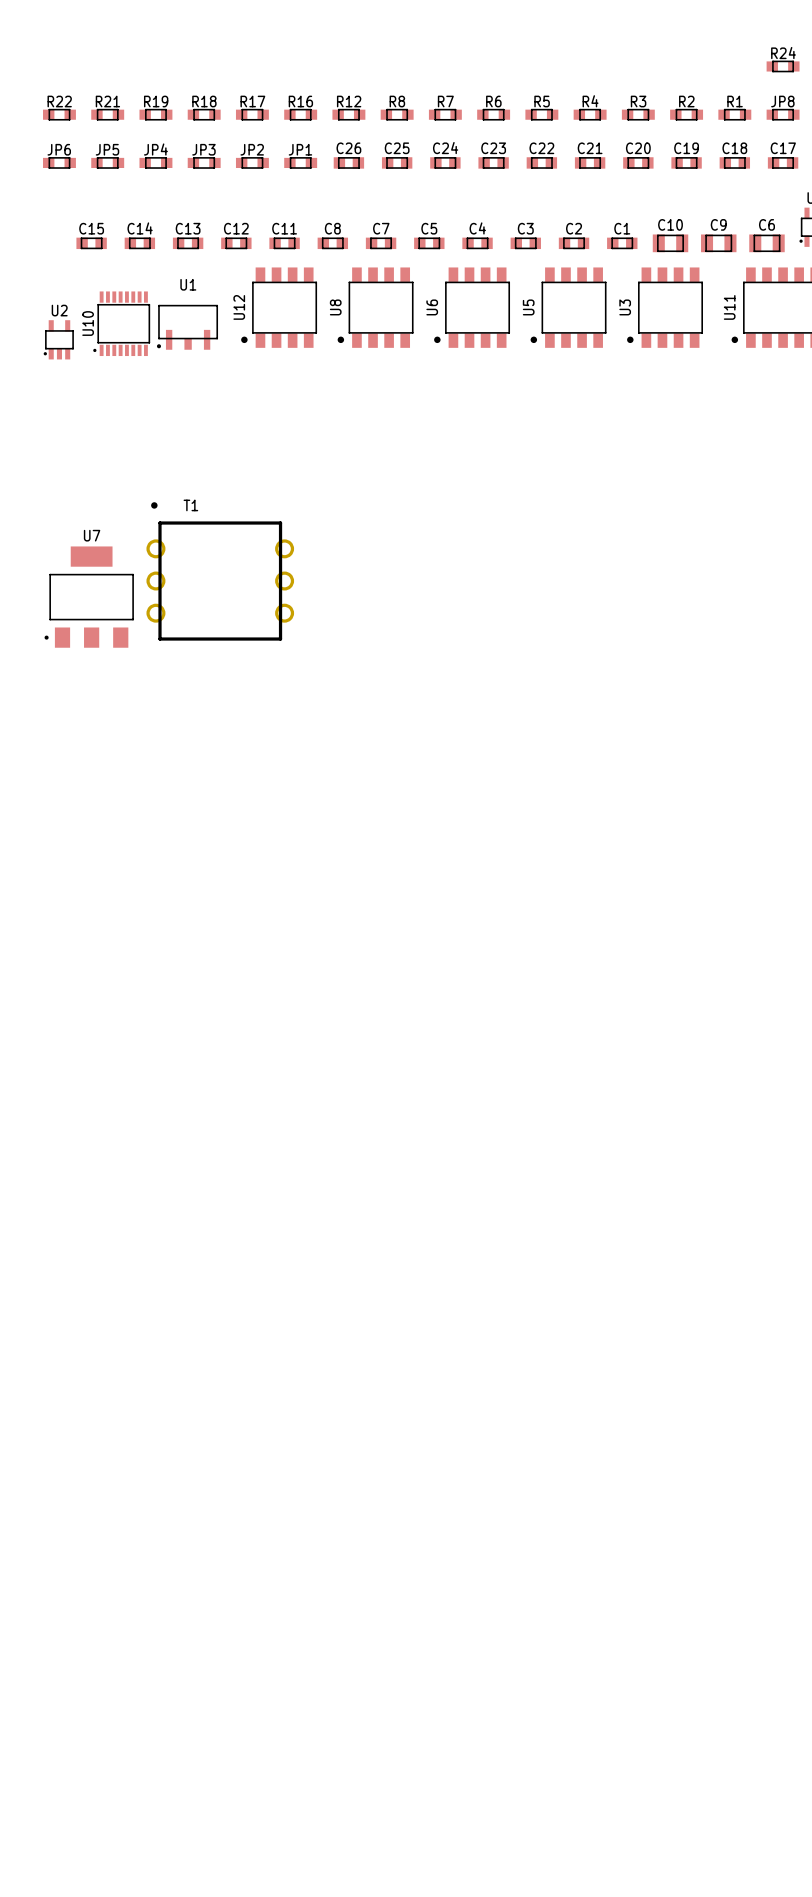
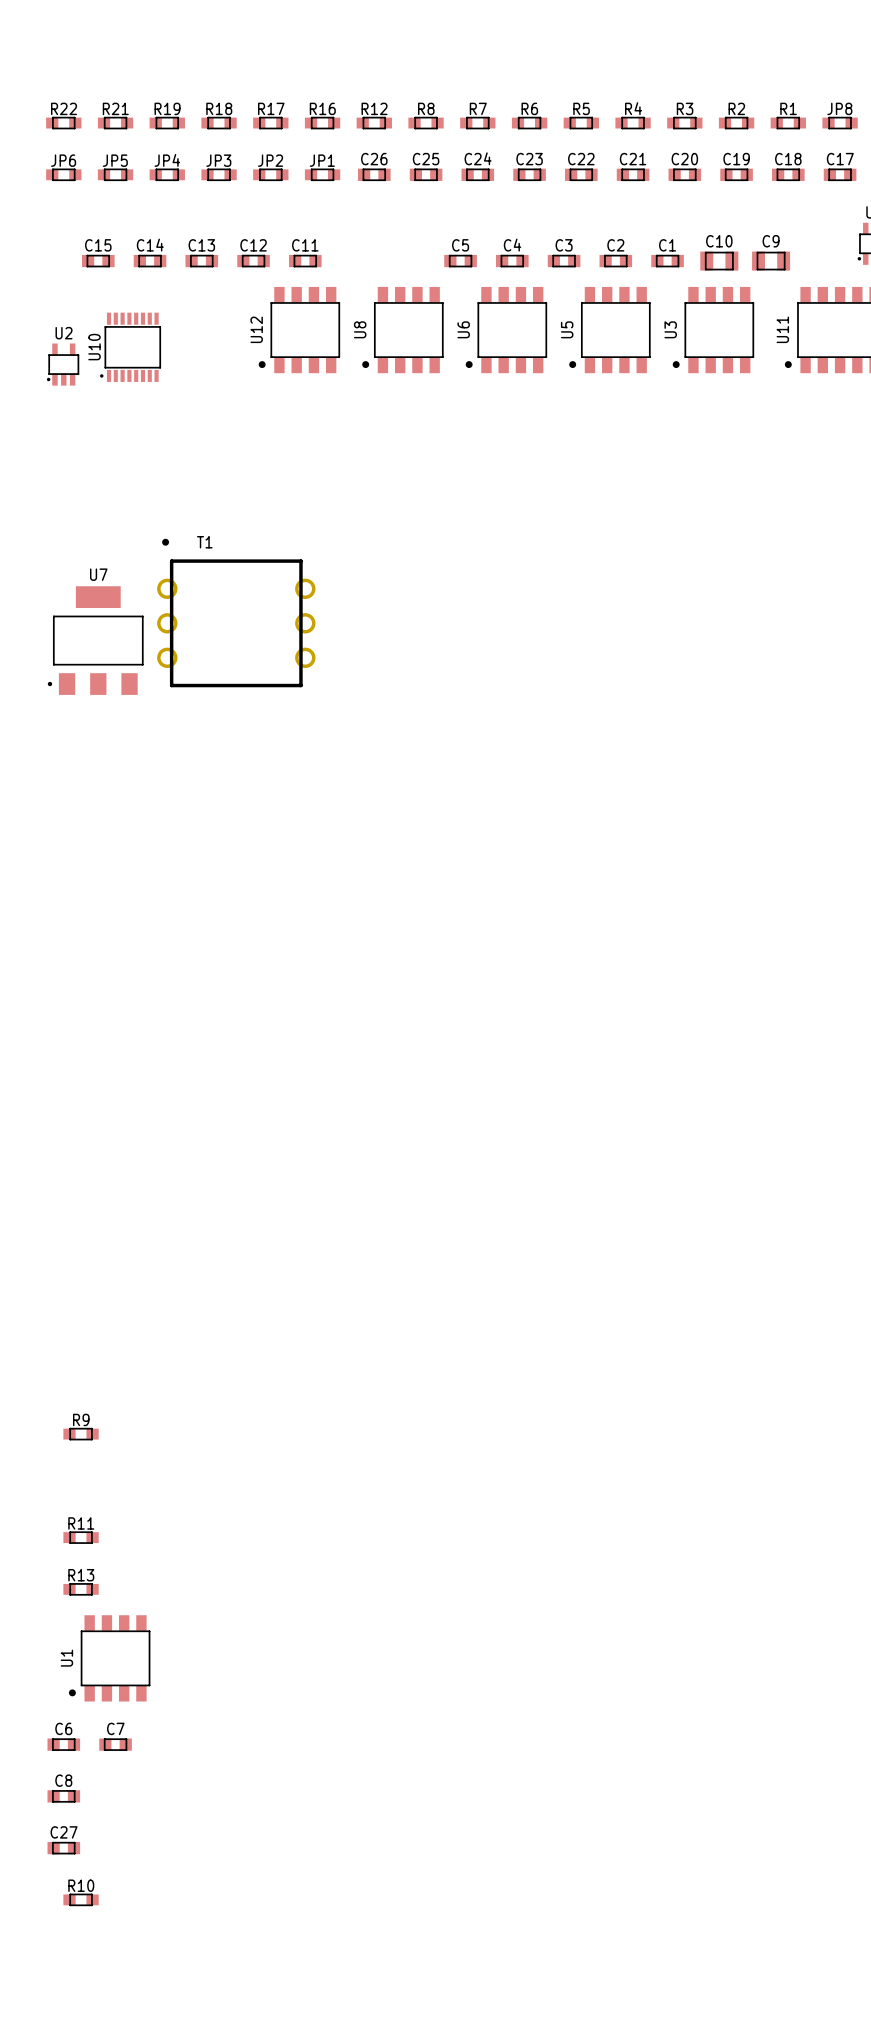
R24: (783, 66) -> none
C6 footprint: [749, 234, 785, 253] -> [47, 1738, 81, 1751]
C8 position: (332, 243) -> (63, 1796)
C7 position: (381, 243) -> (115, 1744)
U1 name position: U1 (188, 284) -> U1 (66, 1658)
U1 footprint: [156, 304, 219, 350] -> [68, 1615, 151, 1702]
R9: none -> (81, 1434)
R11: none -> (81, 1537)
R13: none -> (81, 1589)
C27: none -> (63, 1848)
R10: none -> (81, 1899)

